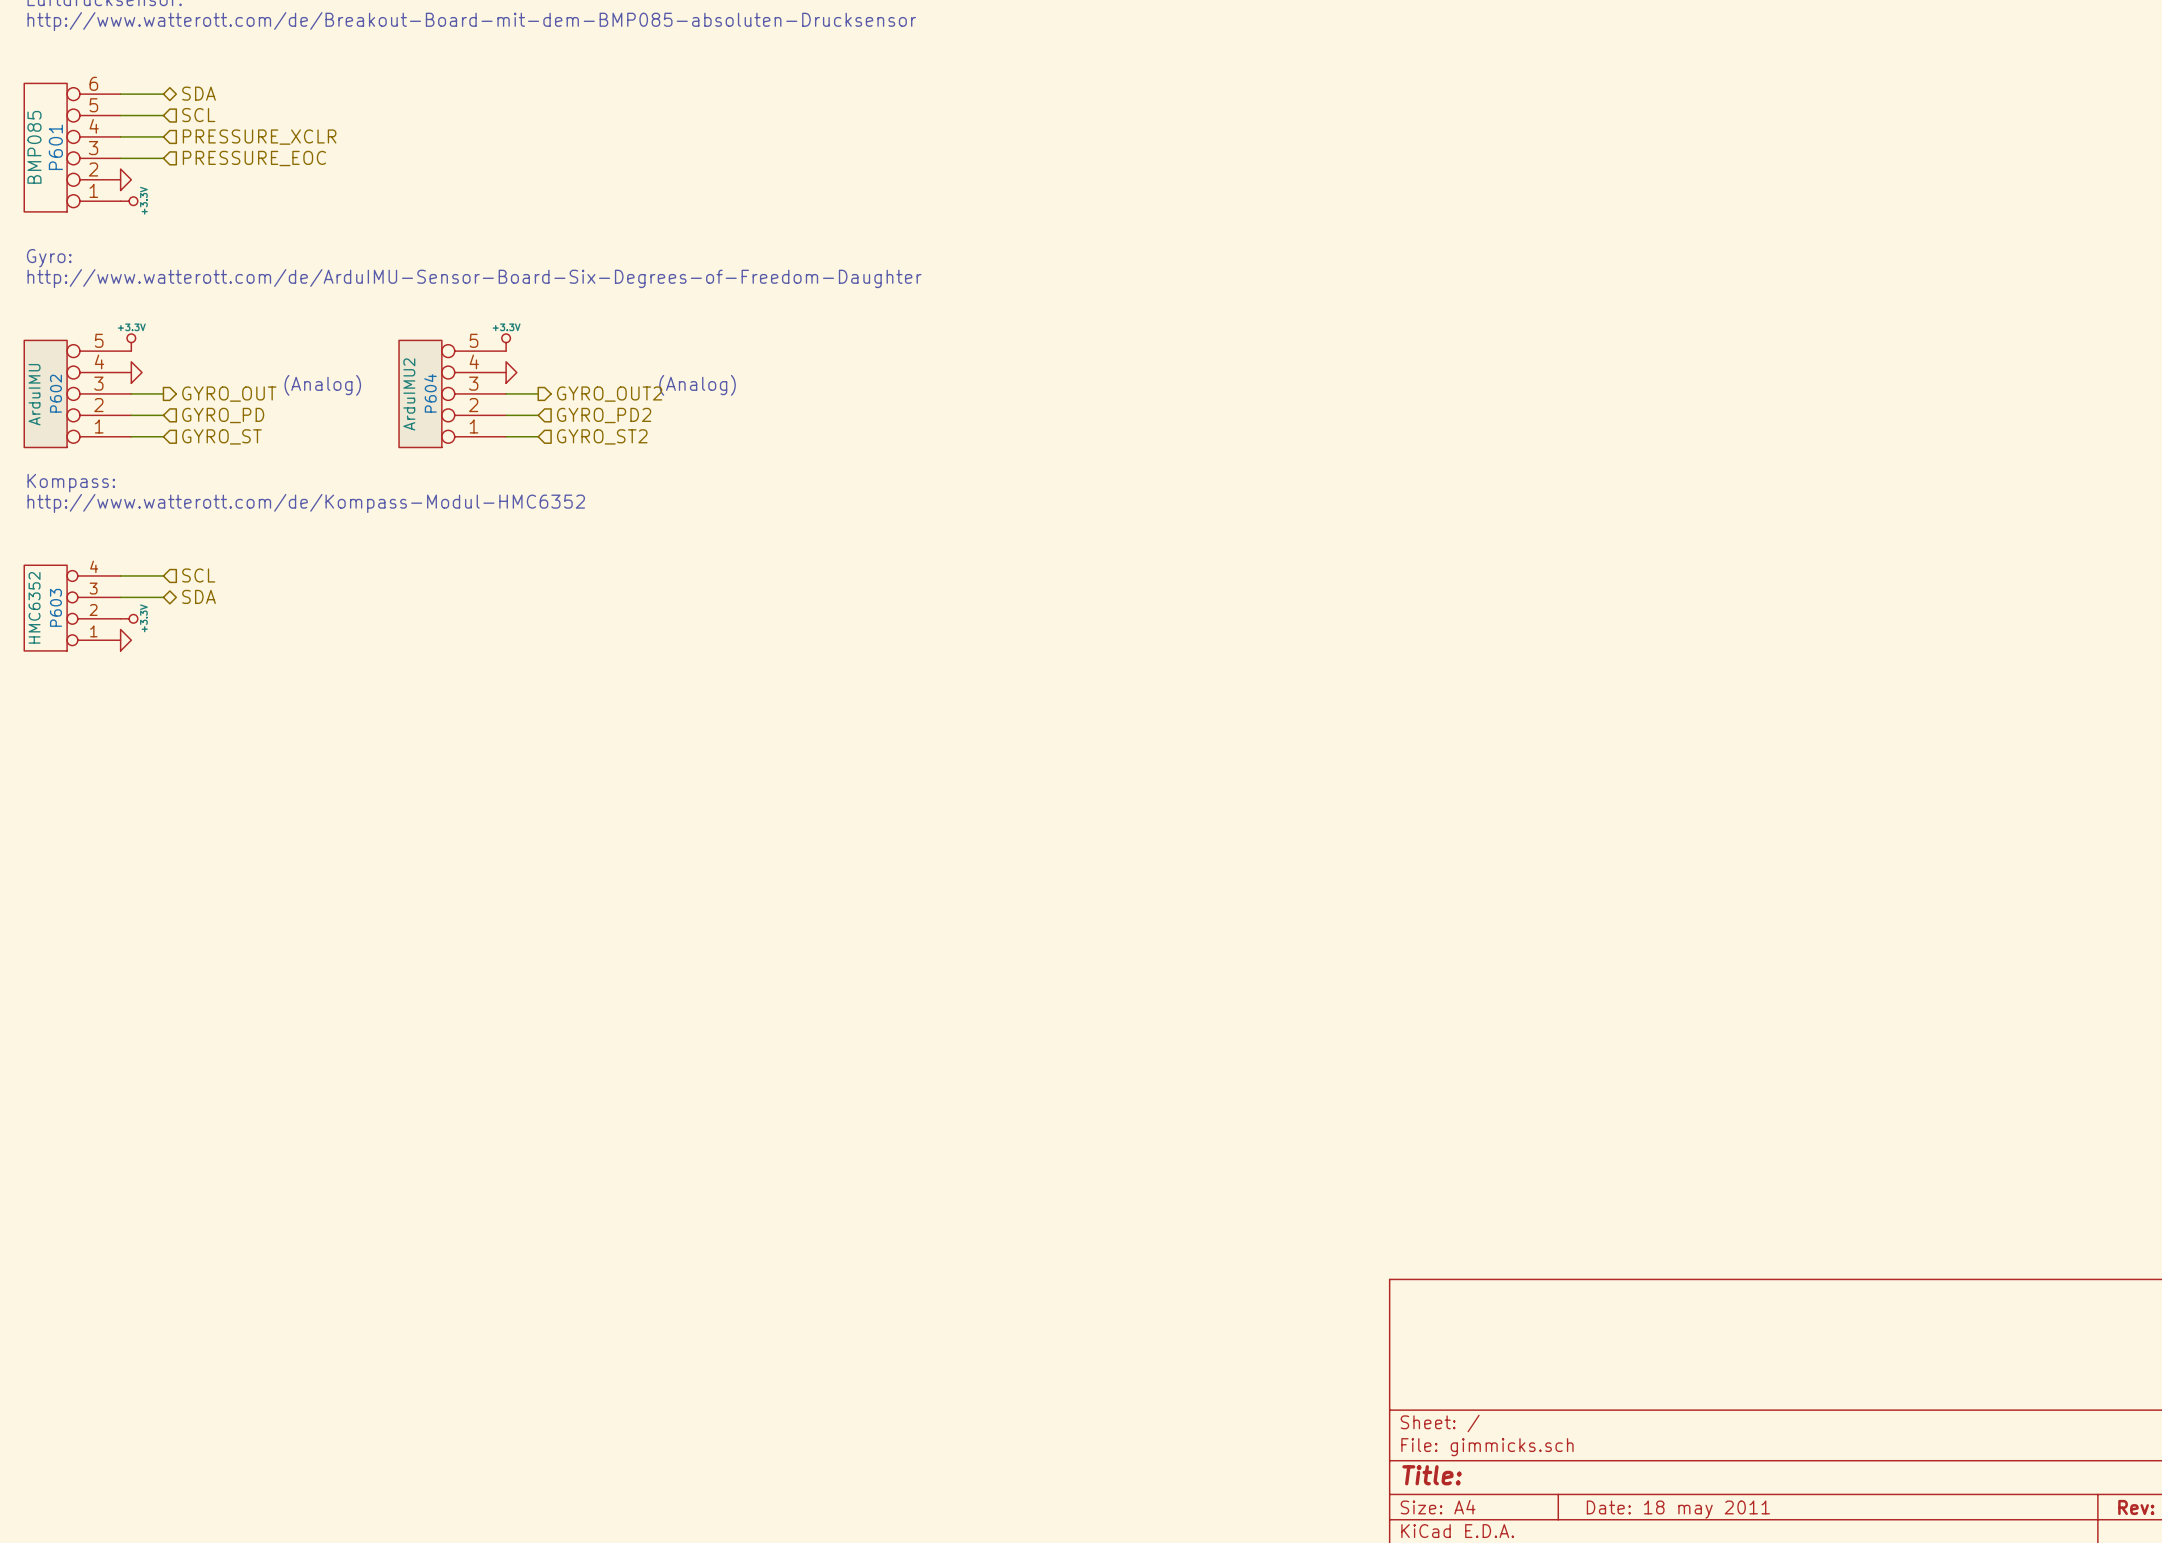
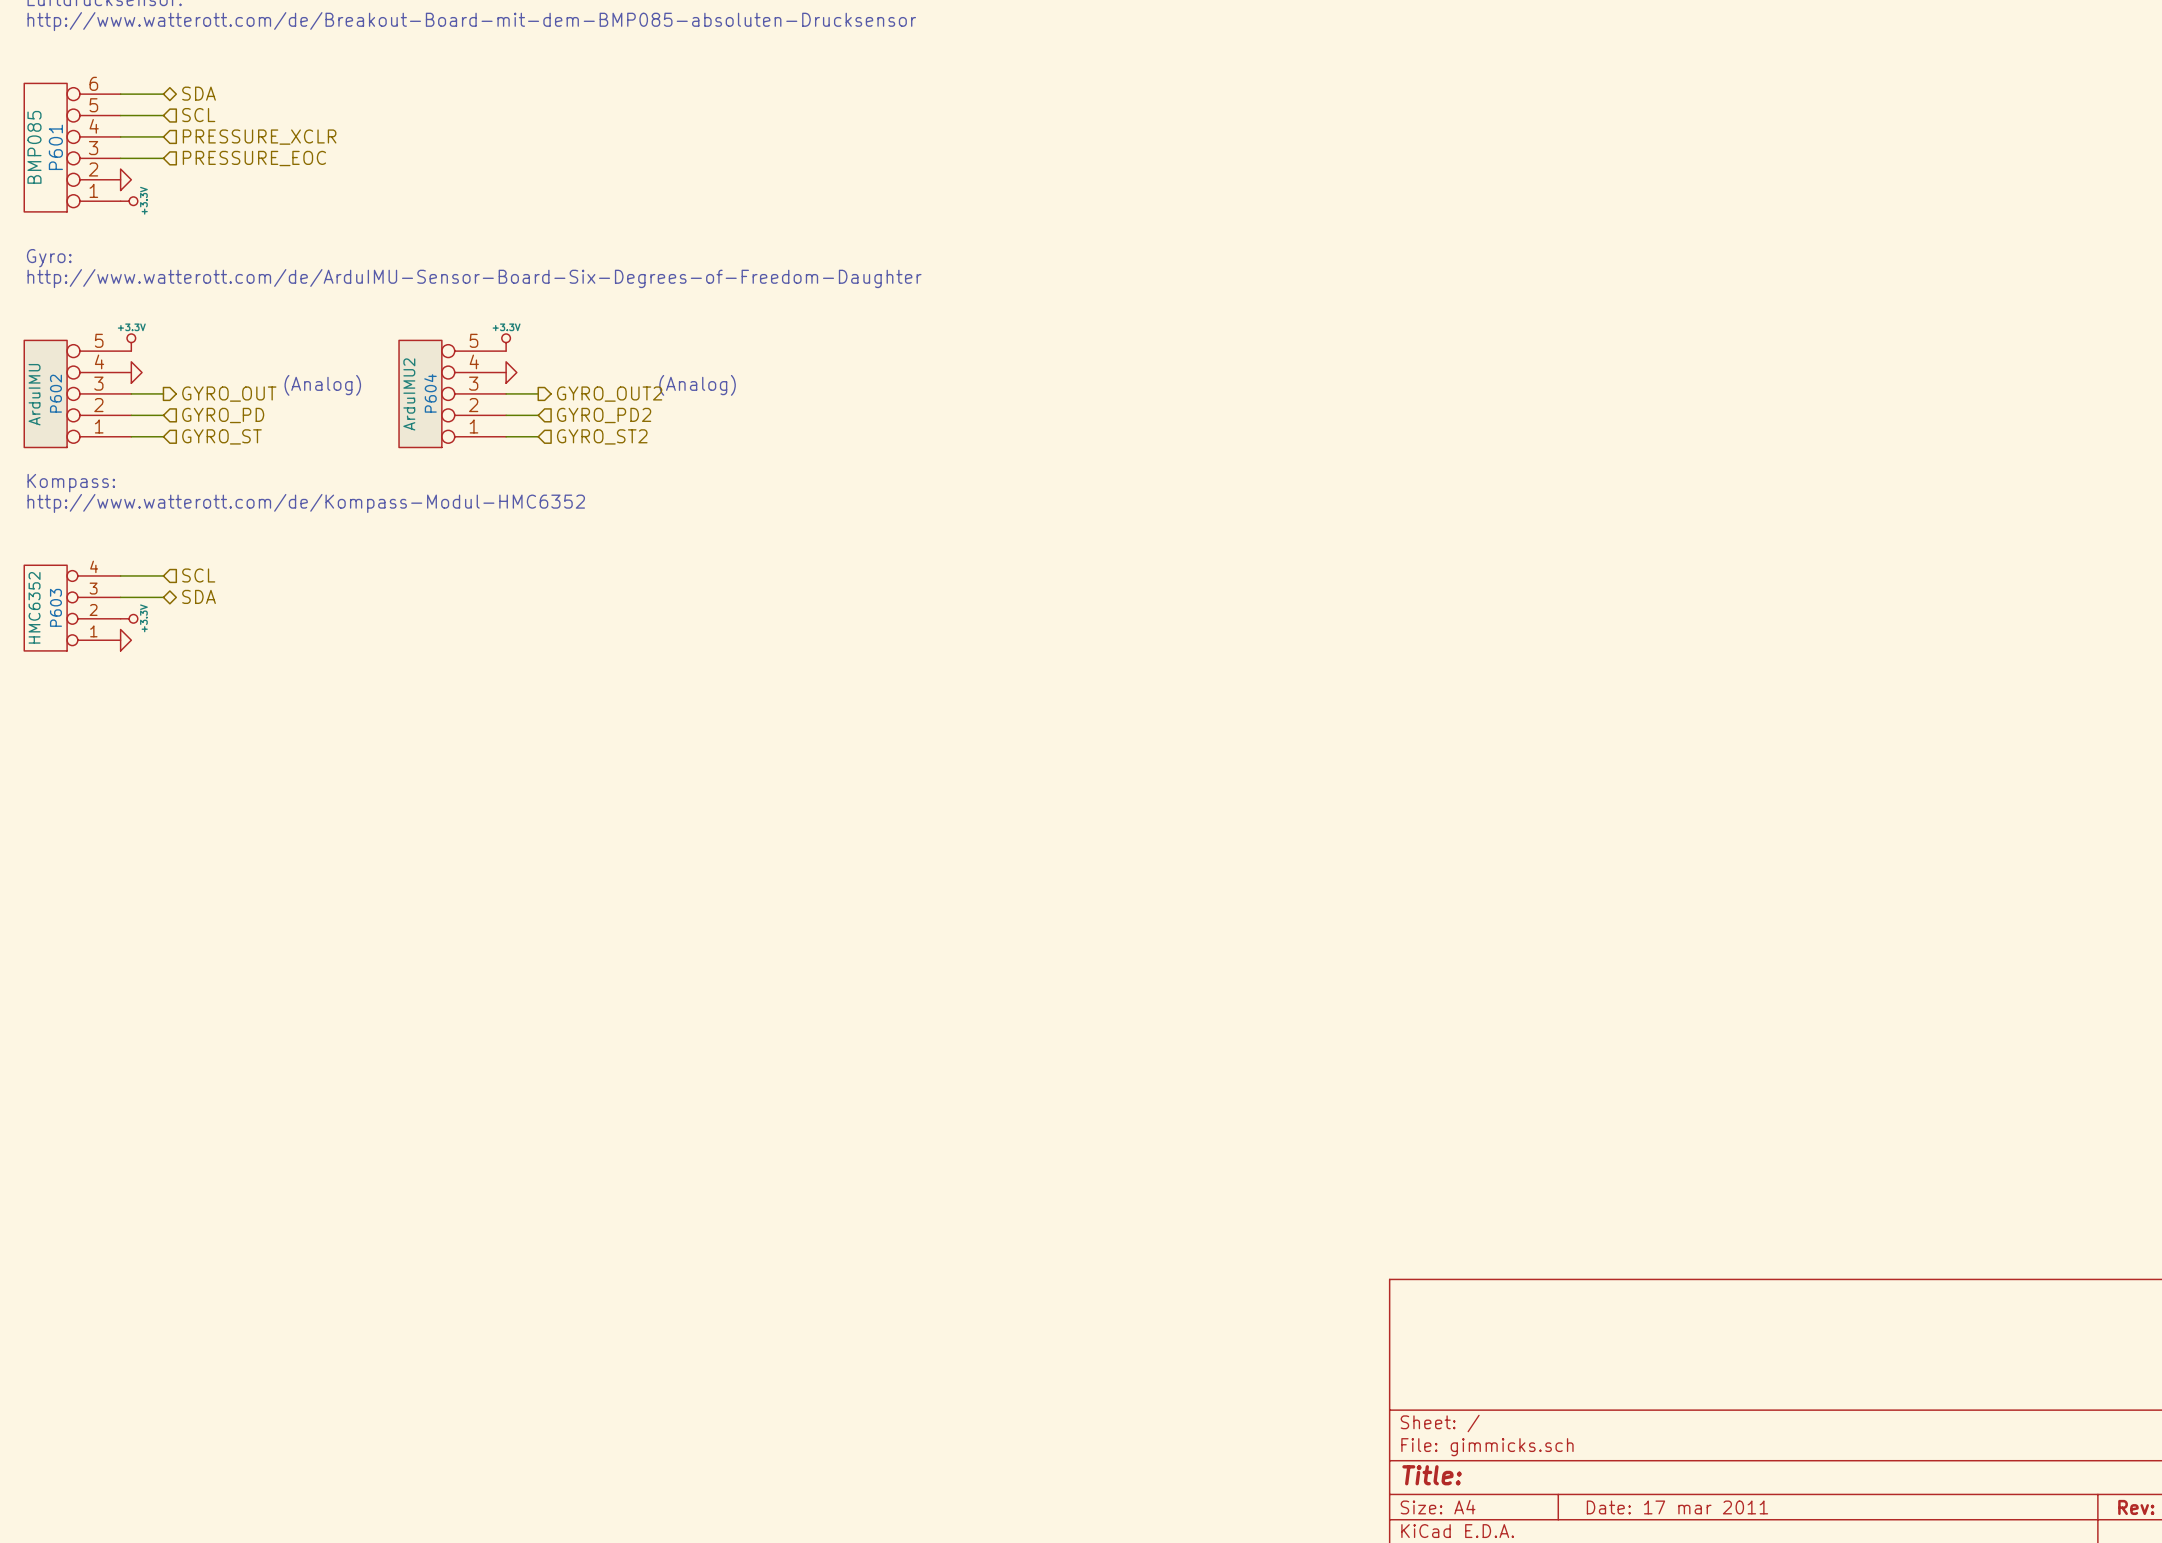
title block: Date: 18 may 2011 (1678, 1509) -> Date: 17 mar 2011 (1677, 1507)

